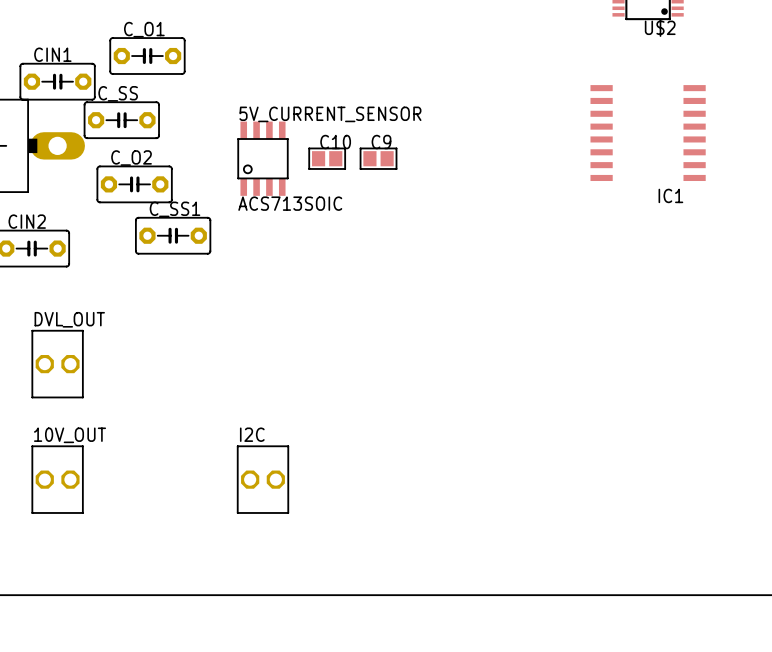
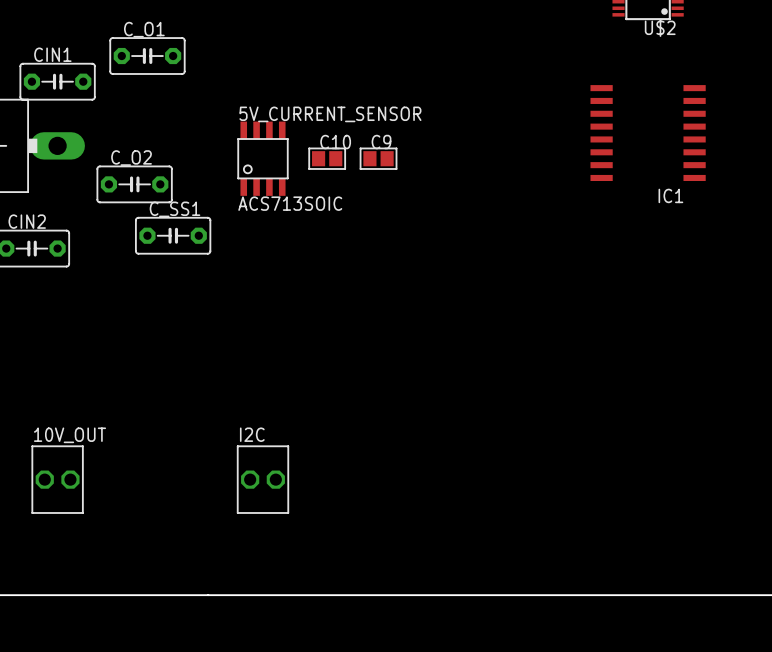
C_SS: (121, 120) -> none
DVL_OUT: (57, 364) -> none

